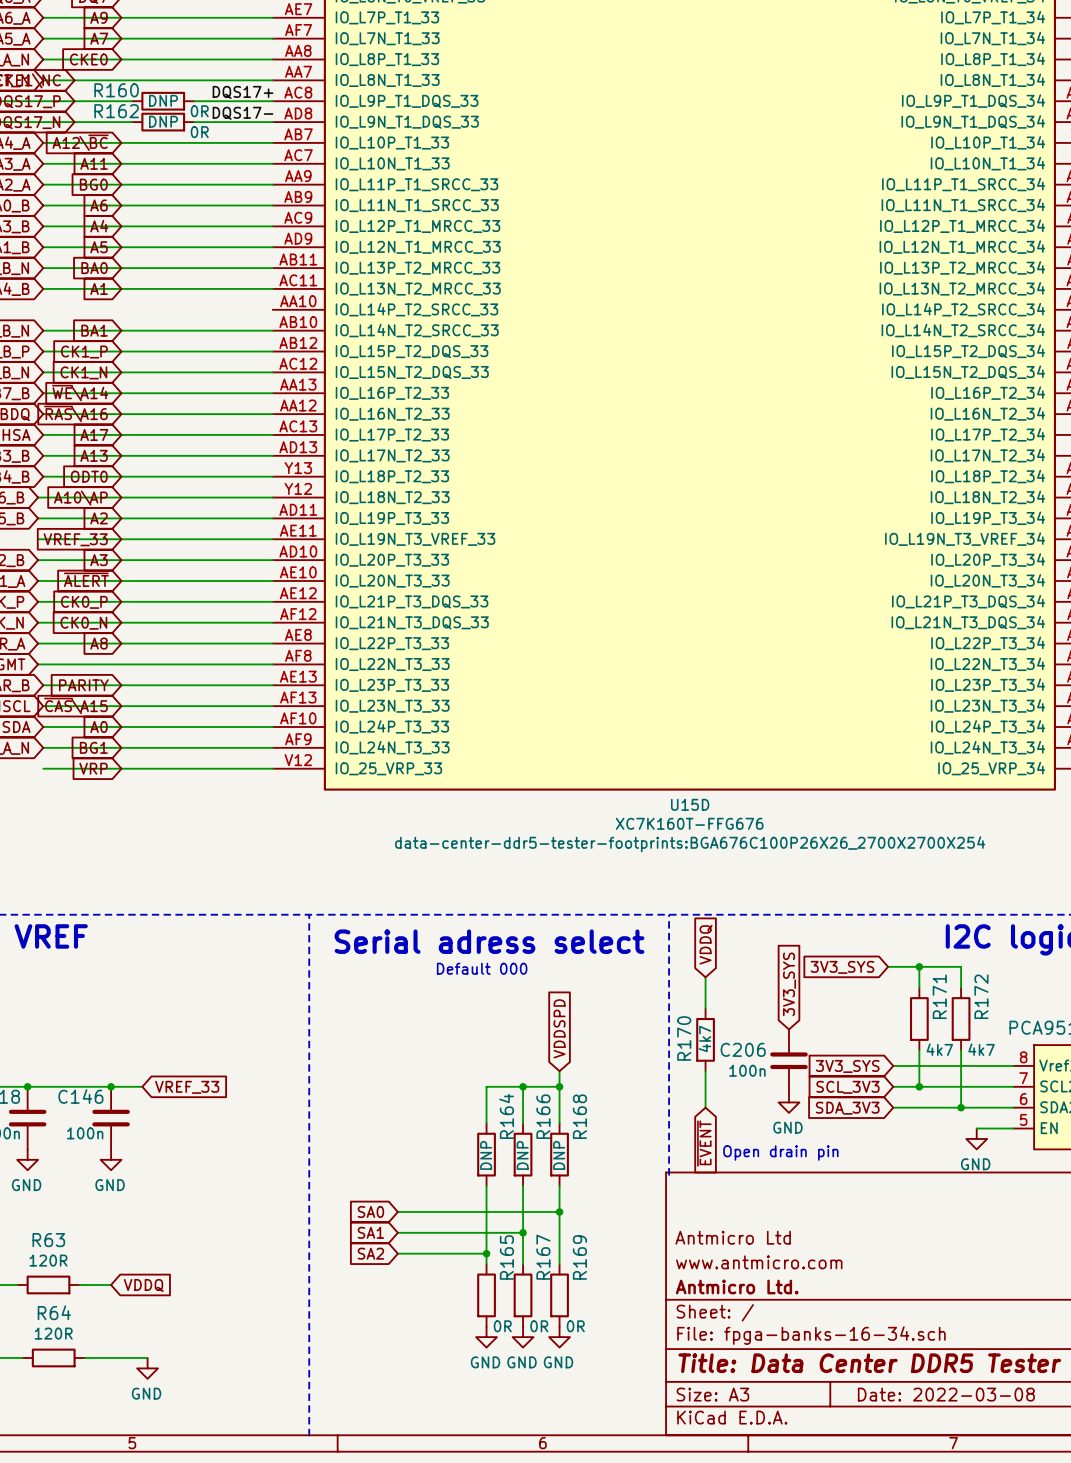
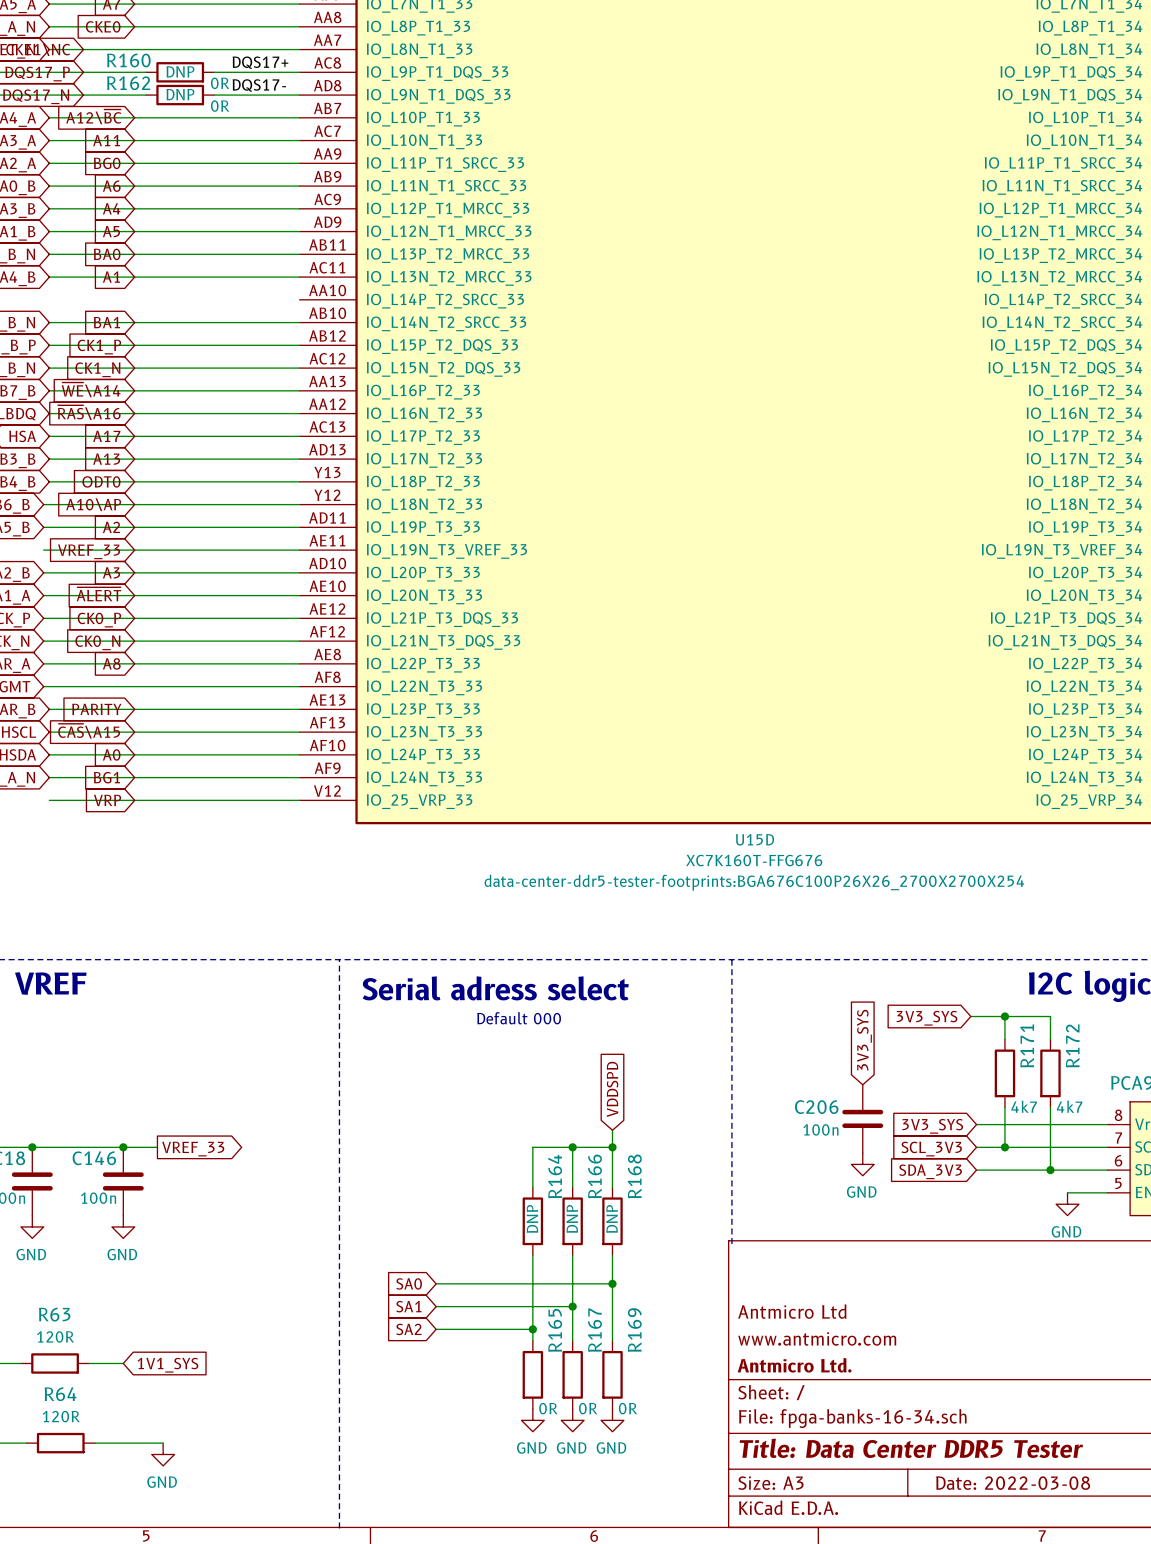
global label: VDDQ (706, 944) -> none
wire: (705, 977) (705, 1008) -> none
R170: (705, 1039) -> none
wire: (705, 1071) (705, 1107) -> none
global label shape: input (187, 1087) -> output (193, 1149)
global label: ~{EVENT} (704, 1143) -> none
text: Open drain pin (780, 1153) -> none
global label: VDDQ (143, 1285) -> 1V1_SYS (167, 1365)

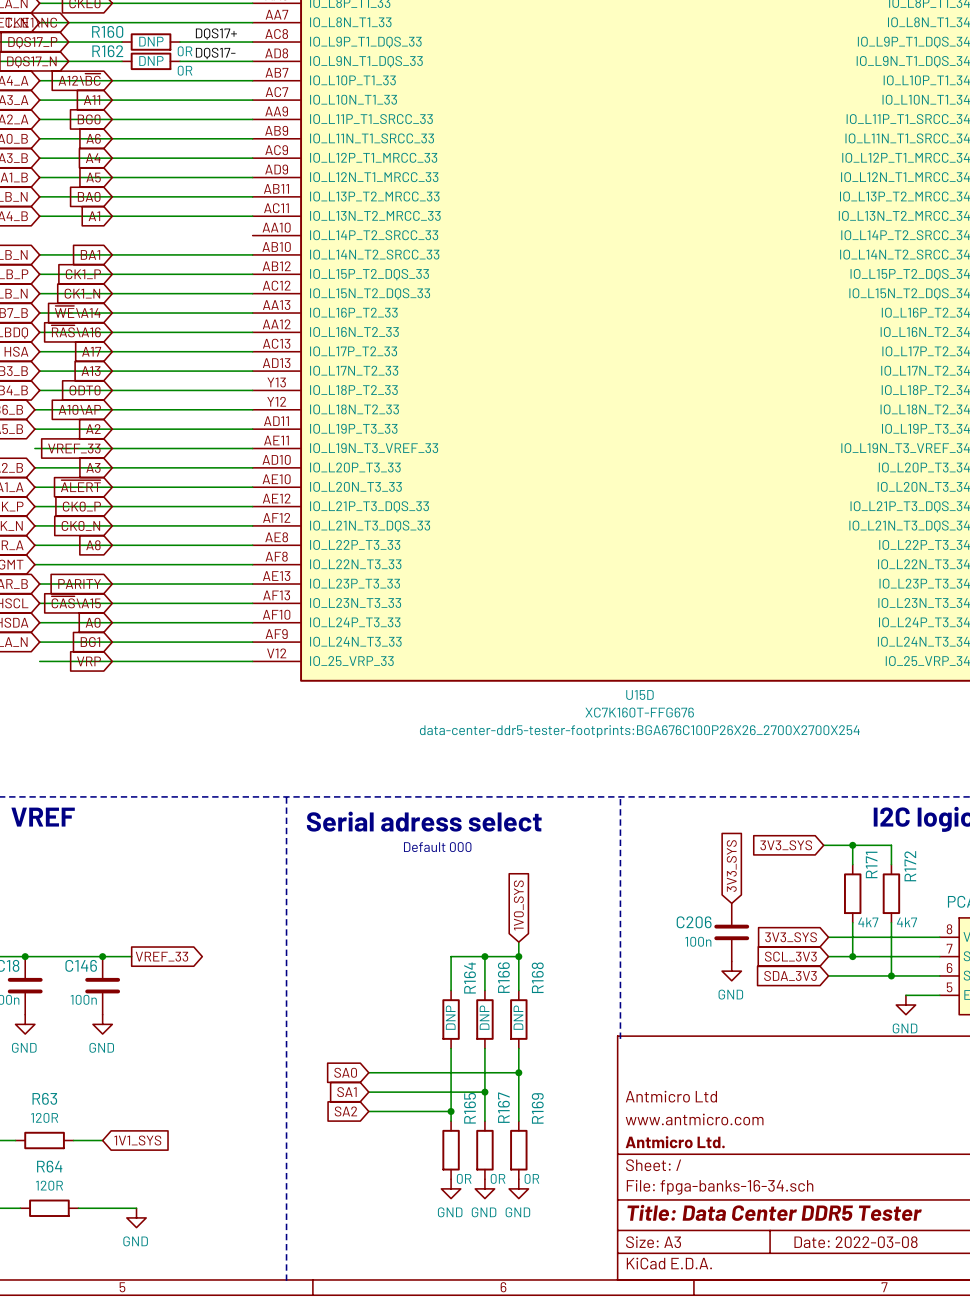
global label: VDDSPD (612, 1089) -> 1V0_SYS (518, 905)

